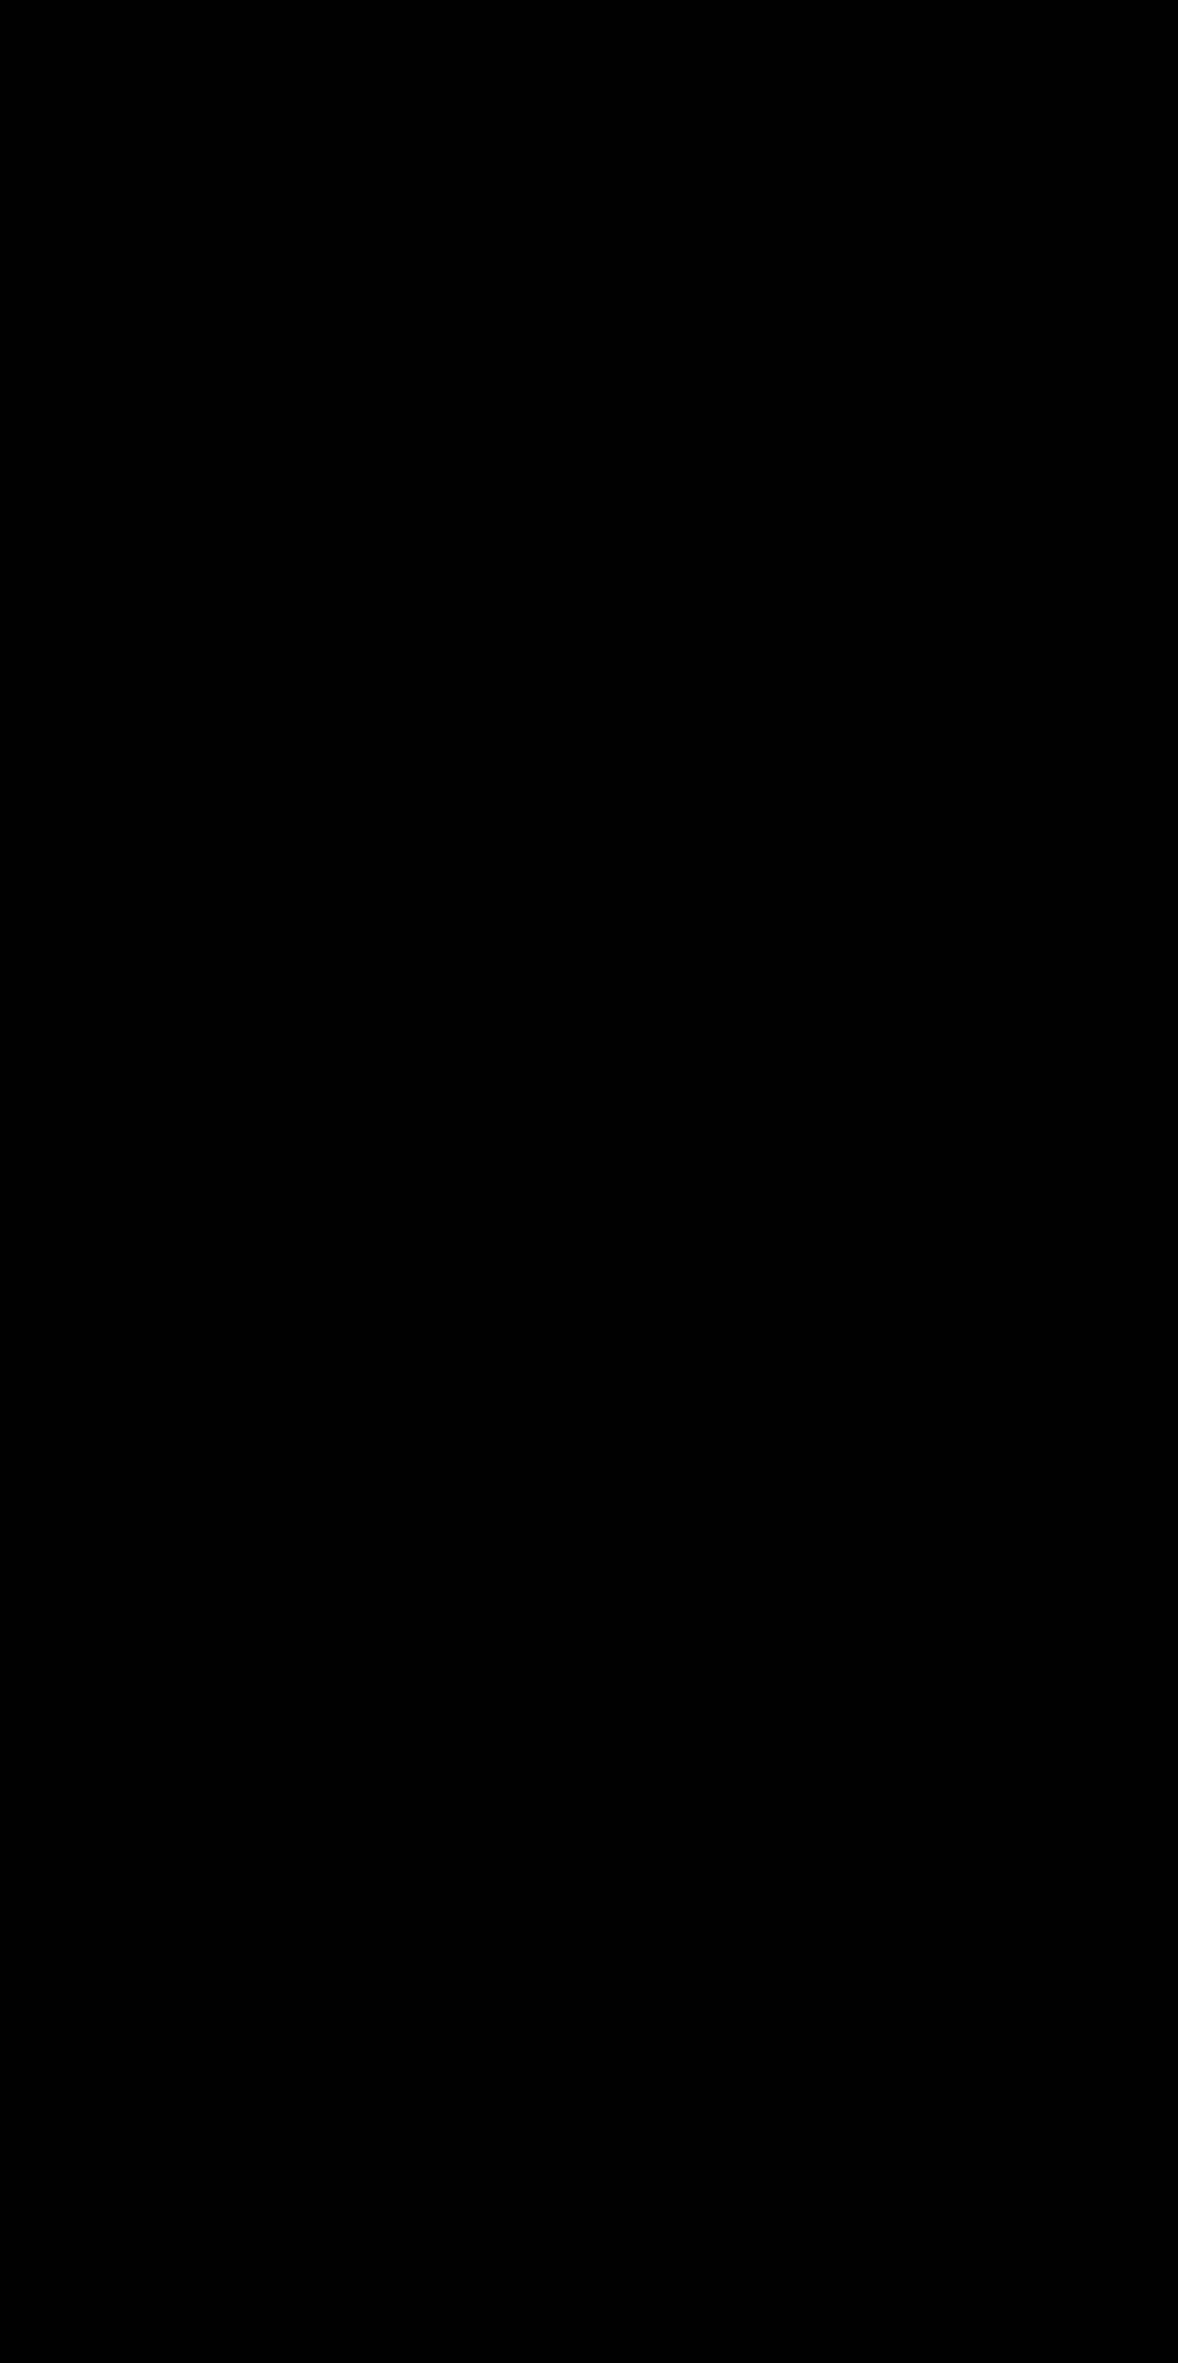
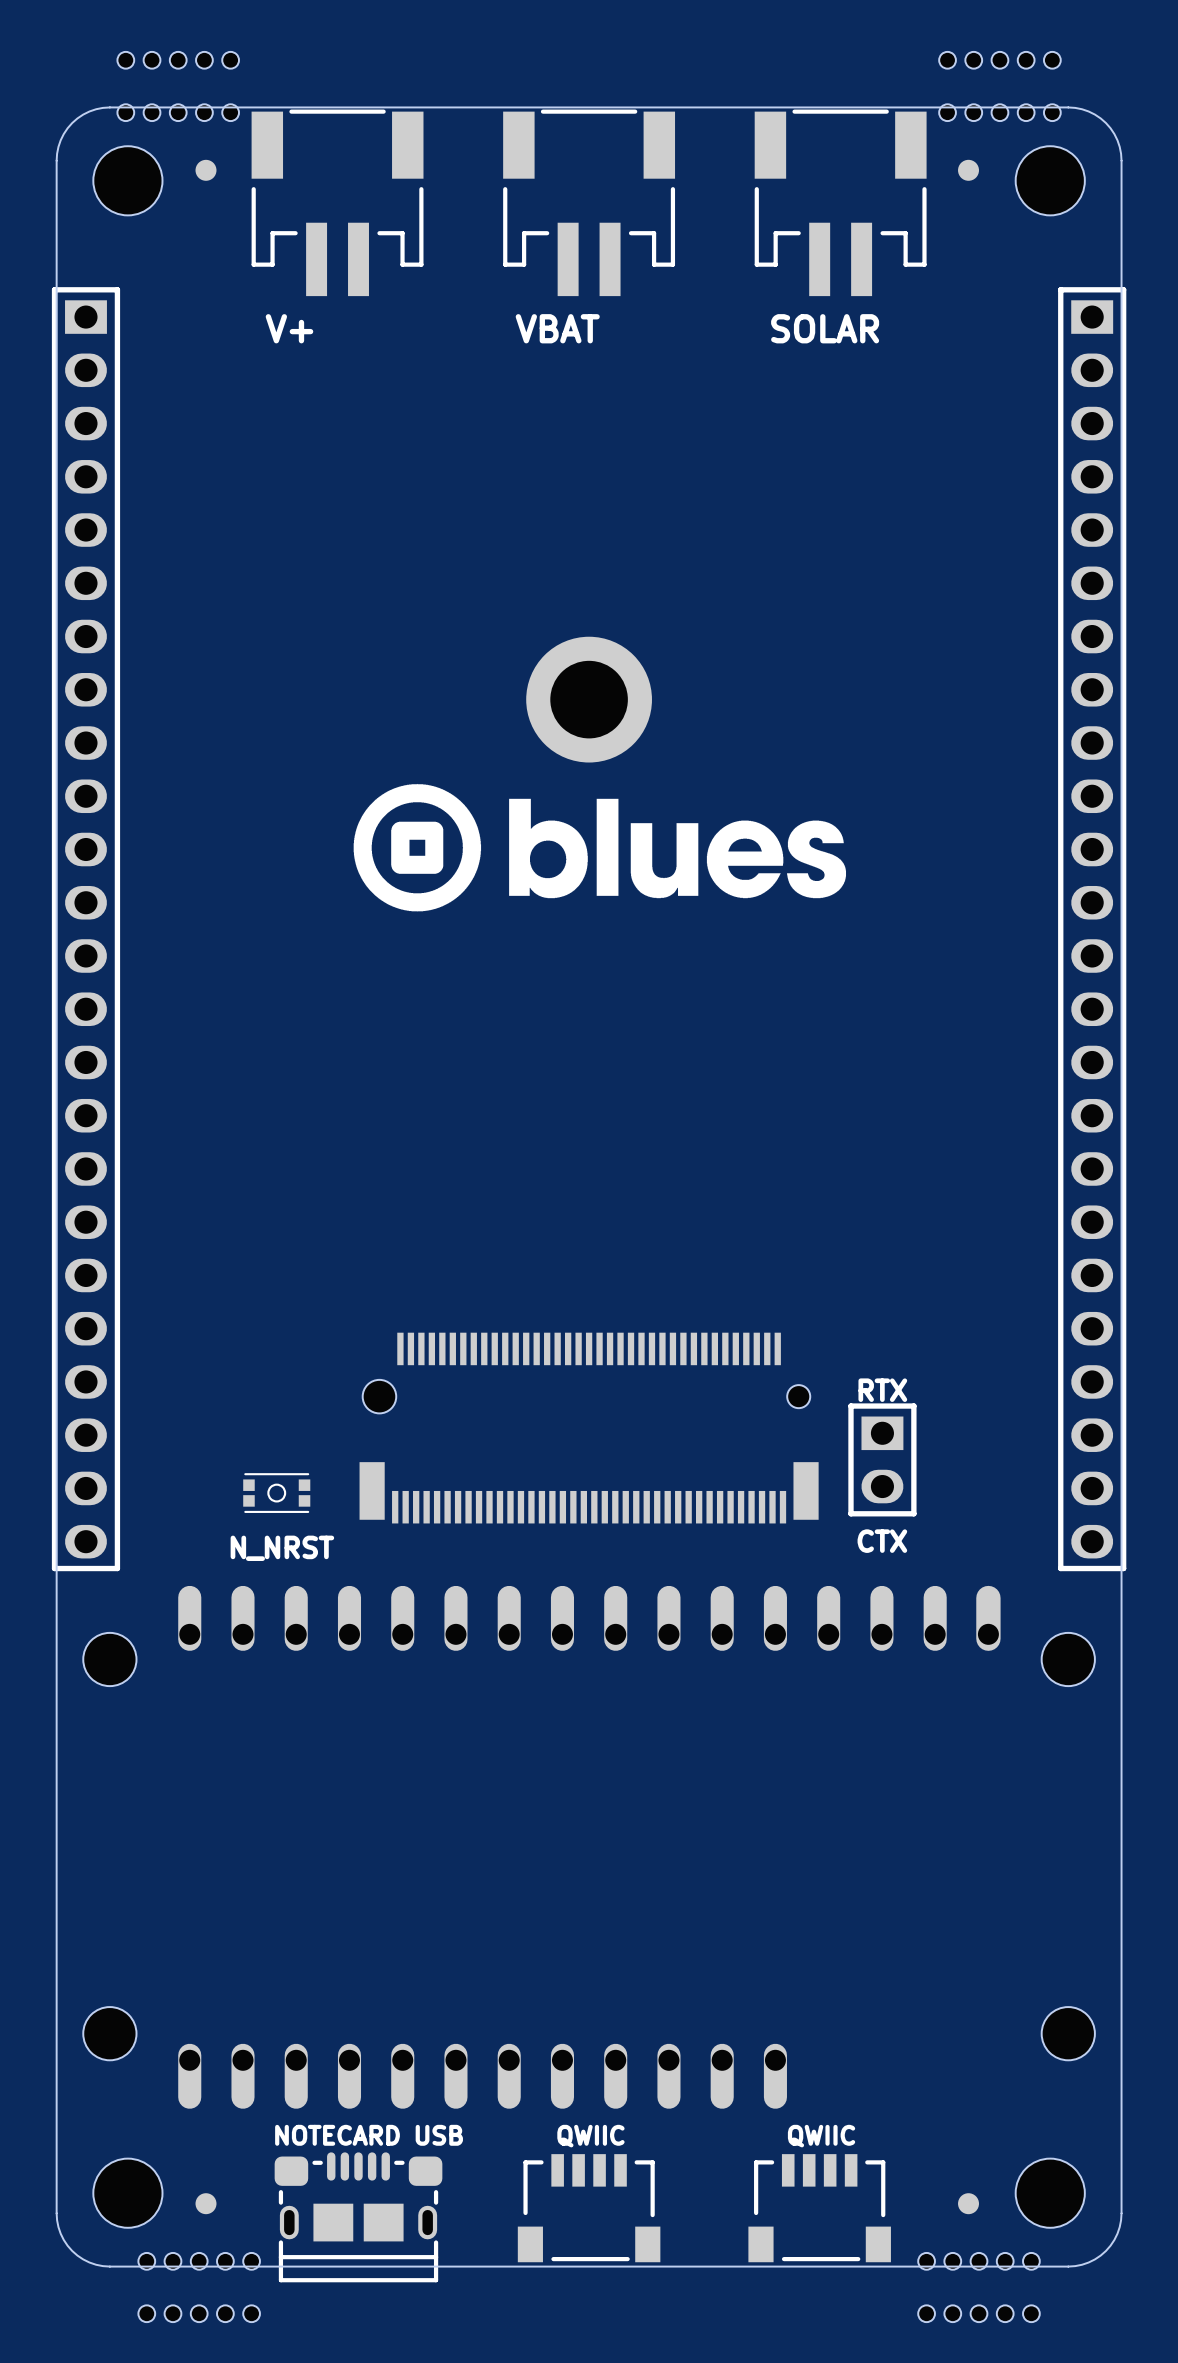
part: none -> (125, 60)
part: none -> (152, 60)
part: none -> (178, 60)
part: none -> (204, 60)
part: none -> (230, 60)
part: none -> (947, 60)
part: none -> (973, 60)
part: none -> (999, 60)
part: none -> (1026, 60)
part: none -> (1052, 60)
board edge: none -> (109, 107) (1068, 107) (1088, 111) (1100, 118) (1110, 128) (1117, 140) (1121, 160) (1121, 2213) (1117, 2233) (1110, 2245) (1100, 2255) (1088, 2262) (1068, 2266) (109, 2266) (96, 2264) (83, 2259) (67, 2245) (60, 2233) (56, 2213) (56, 160) (60, 140) (72, 123) (89, 111) (109, 107)
part: none -> (125, 112)
part: none -> (152, 112)
part: none -> (178, 112)
part: none -> (204, 112)
part: none -> (230, 112)
part: none -> (947, 112)
part: none -> (973, 112)
part: none -> (999, 112)
part: none -> (1026, 112)
part: none -> (1052, 112)
part: none -> (206, 170)
part: none -> (968, 170)
part: none -> (127, 180)
part: none -> (1050, 180)
part: none -> (337, 202)
part: none -> (589, 202)
part: none -> (840, 202)
text: none -> V+ (289, 328)
text: none -> VBAT (557, 328)
text: none -> SOLAR (825, 328)
part: none -> (589, 699)
drawing: none -> [353, 783, 482, 912]
drawing: none -> [509, 798, 847, 899]
part: none -> (85, 929)
part: none -> (1092, 929)
text: none -> RTX (882, 1390)
part: none -> (589, 1428)
part: none -> (882, 1459)
part: none -> (276, 1493)
text: none -> CTX (882, 1541)
text: none -> N_NRST (282, 1548)
part: none -> (589, 1618)
part: none -> (109, 1659)
part: none -> (1068, 1659)
part: none -> (109, 2033)
part: none -> (1068, 2033)
part: none -> (482, 2076)
text: none -> NOTECARD USB (369, 2135)
text: none -> QWIIC (590, 2136)
text: none -> QWIIC (821, 2136)
part: none -> (127, 2193)
part: none -> (1050, 2193)
part: none -> (206, 2203)
part: none -> (968, 2203)
part: none -> (589, 2208)
part: none -> (819, 2208)
part: none -> (358, 2217)
part: none -> (146, 2261)
part: none -> (172, 2261)
part: none -> (199, 2261)
part: none -> (225, 2261)
part: none -> (251, 2261)
part: none -> (926, 2261)
part: none -> (952, 2261)
part: none -> (978, 2261)
part: none -> (1005, 2261)
part: none -> (1031, 2261)
part: none -> (146, 2313)
part: none -> (172, 2313)
part: none -> (199, 2313)
part: none -> (225, 2313)
part: none -> (251, 2313)
part: none -> (926, 2313)
part: none -> (952, 2313)
part: none -> (978, 2313)
part: none -> (1005, 2313)
part: none -> (1031, 2313)

